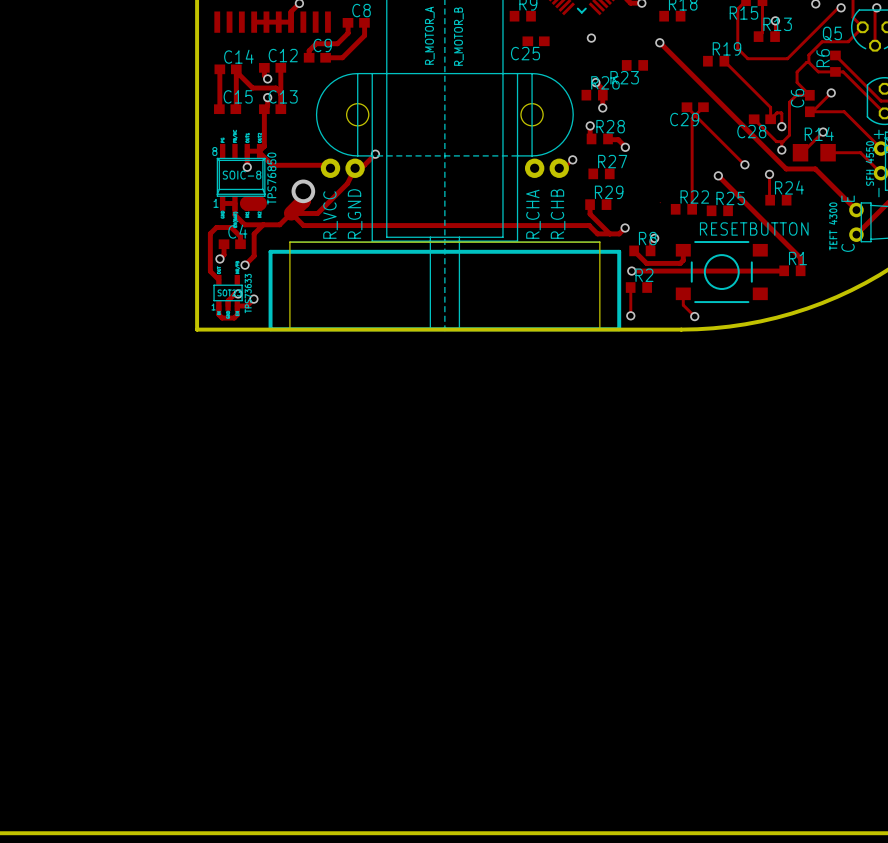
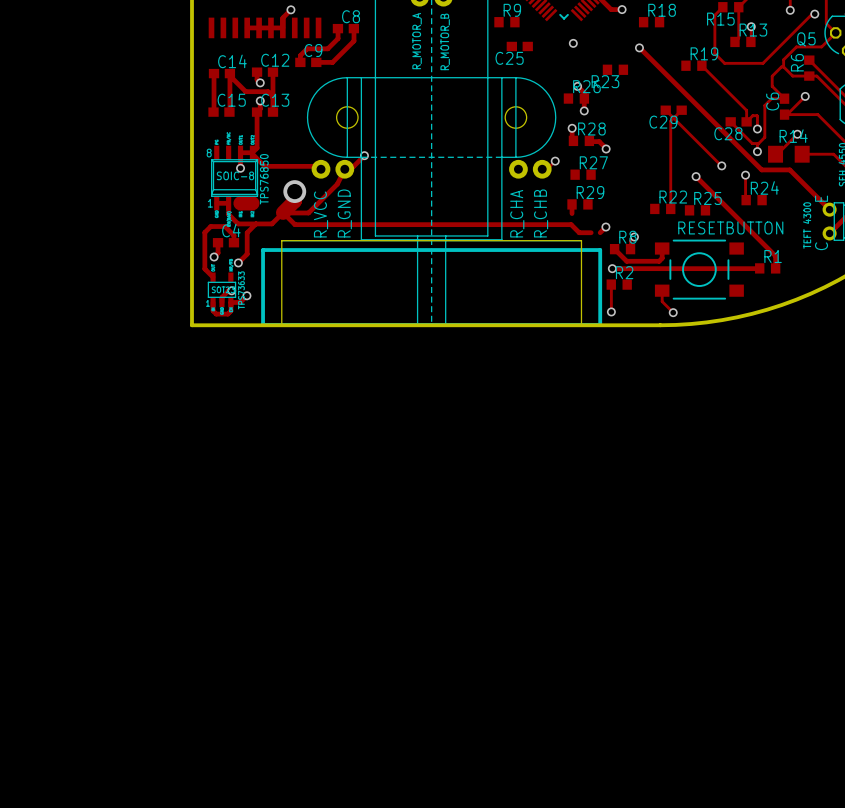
track: (590, 214) (609, 233) (619, 233) -> none

